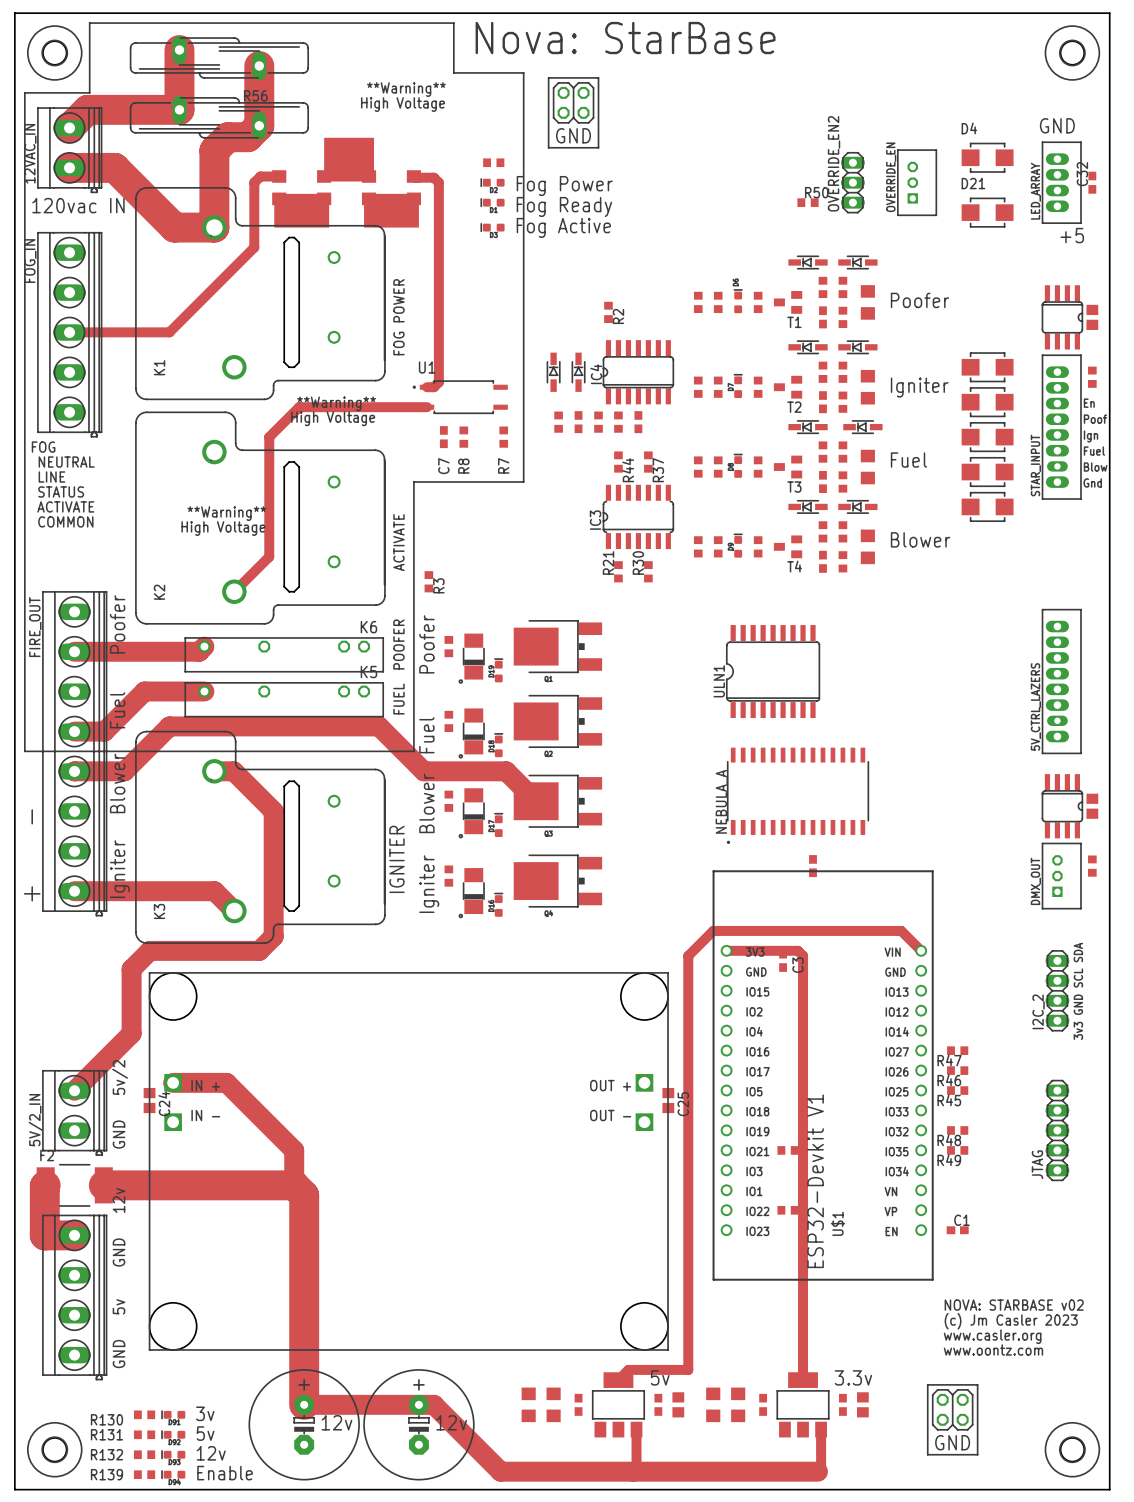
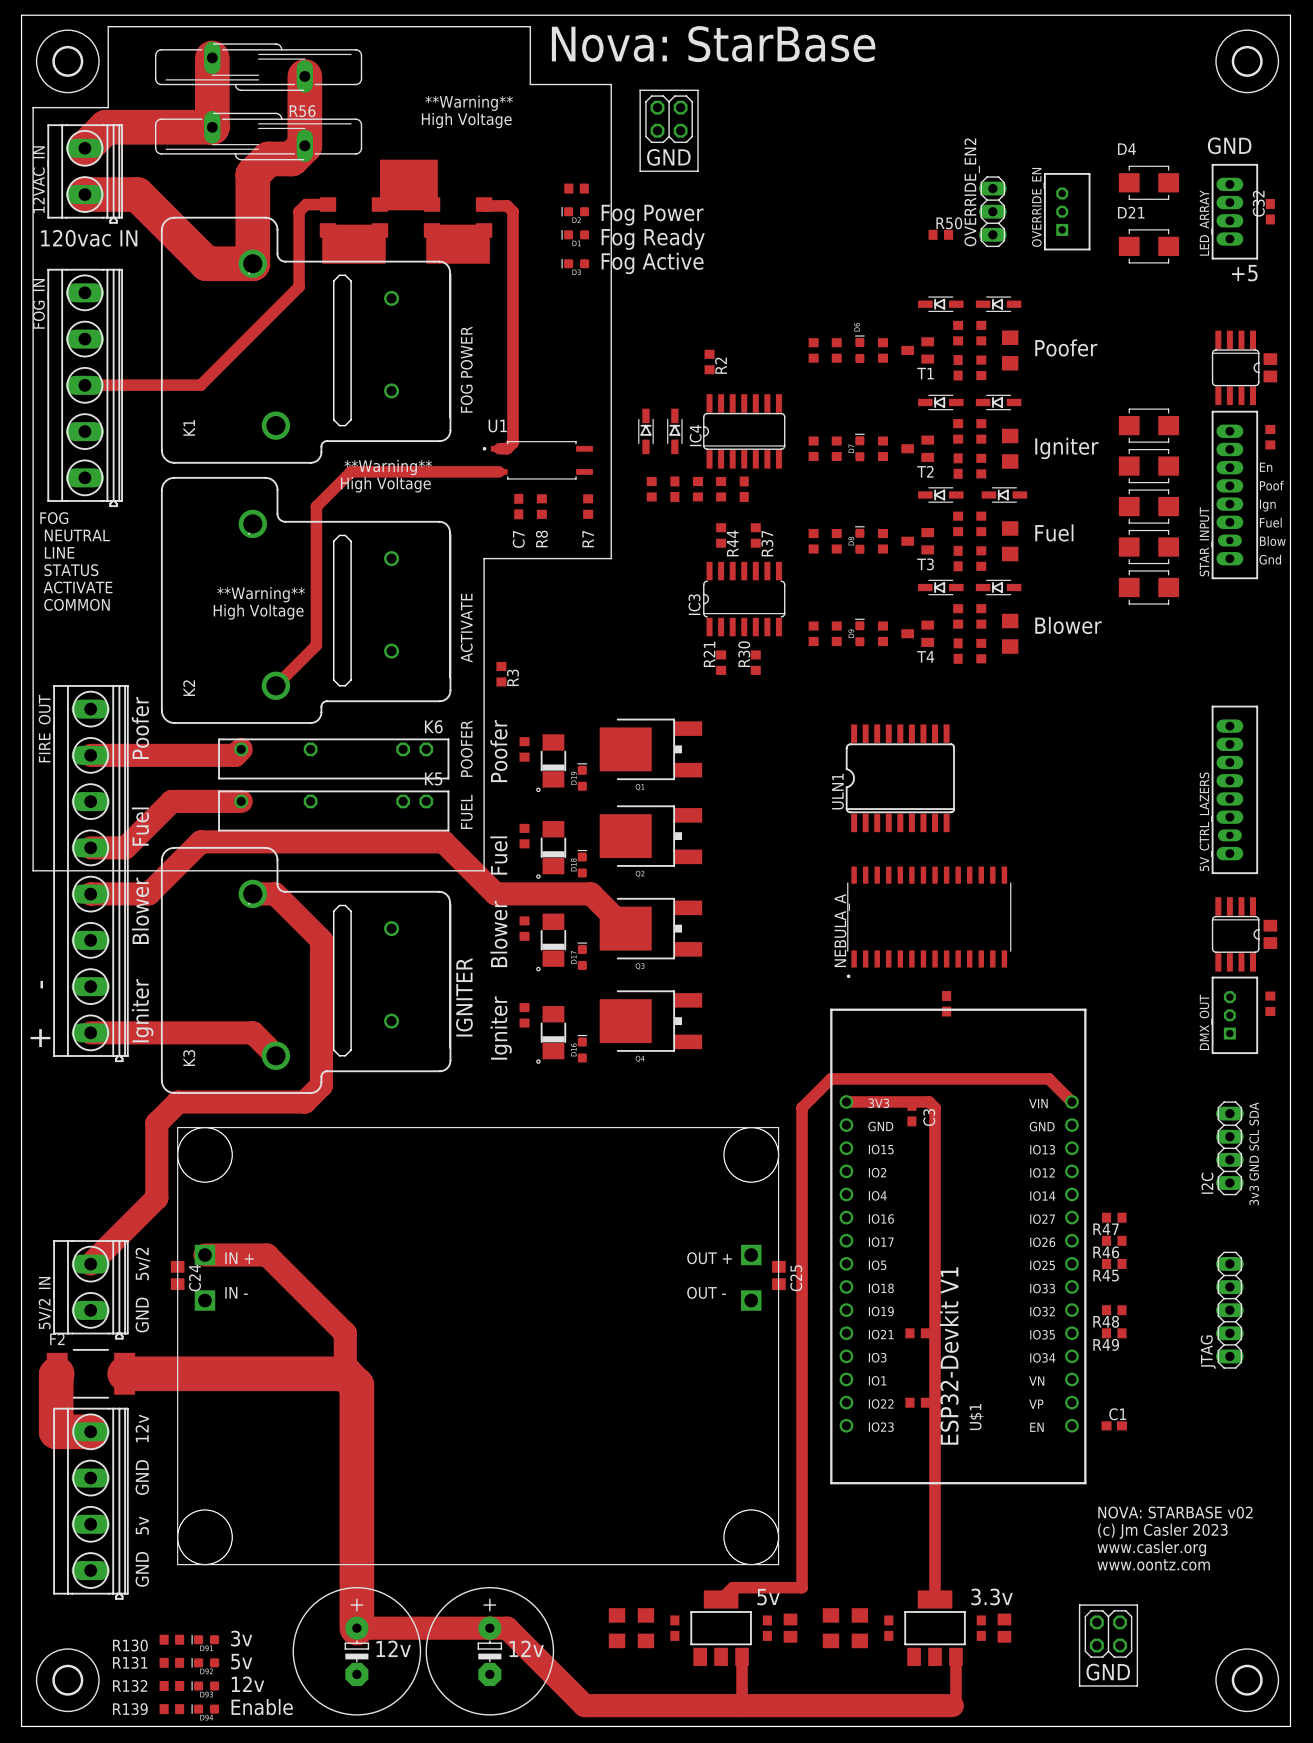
I2C_2 name: I2C_2 (1038, 1011) -> I2C (1207, 1183)

